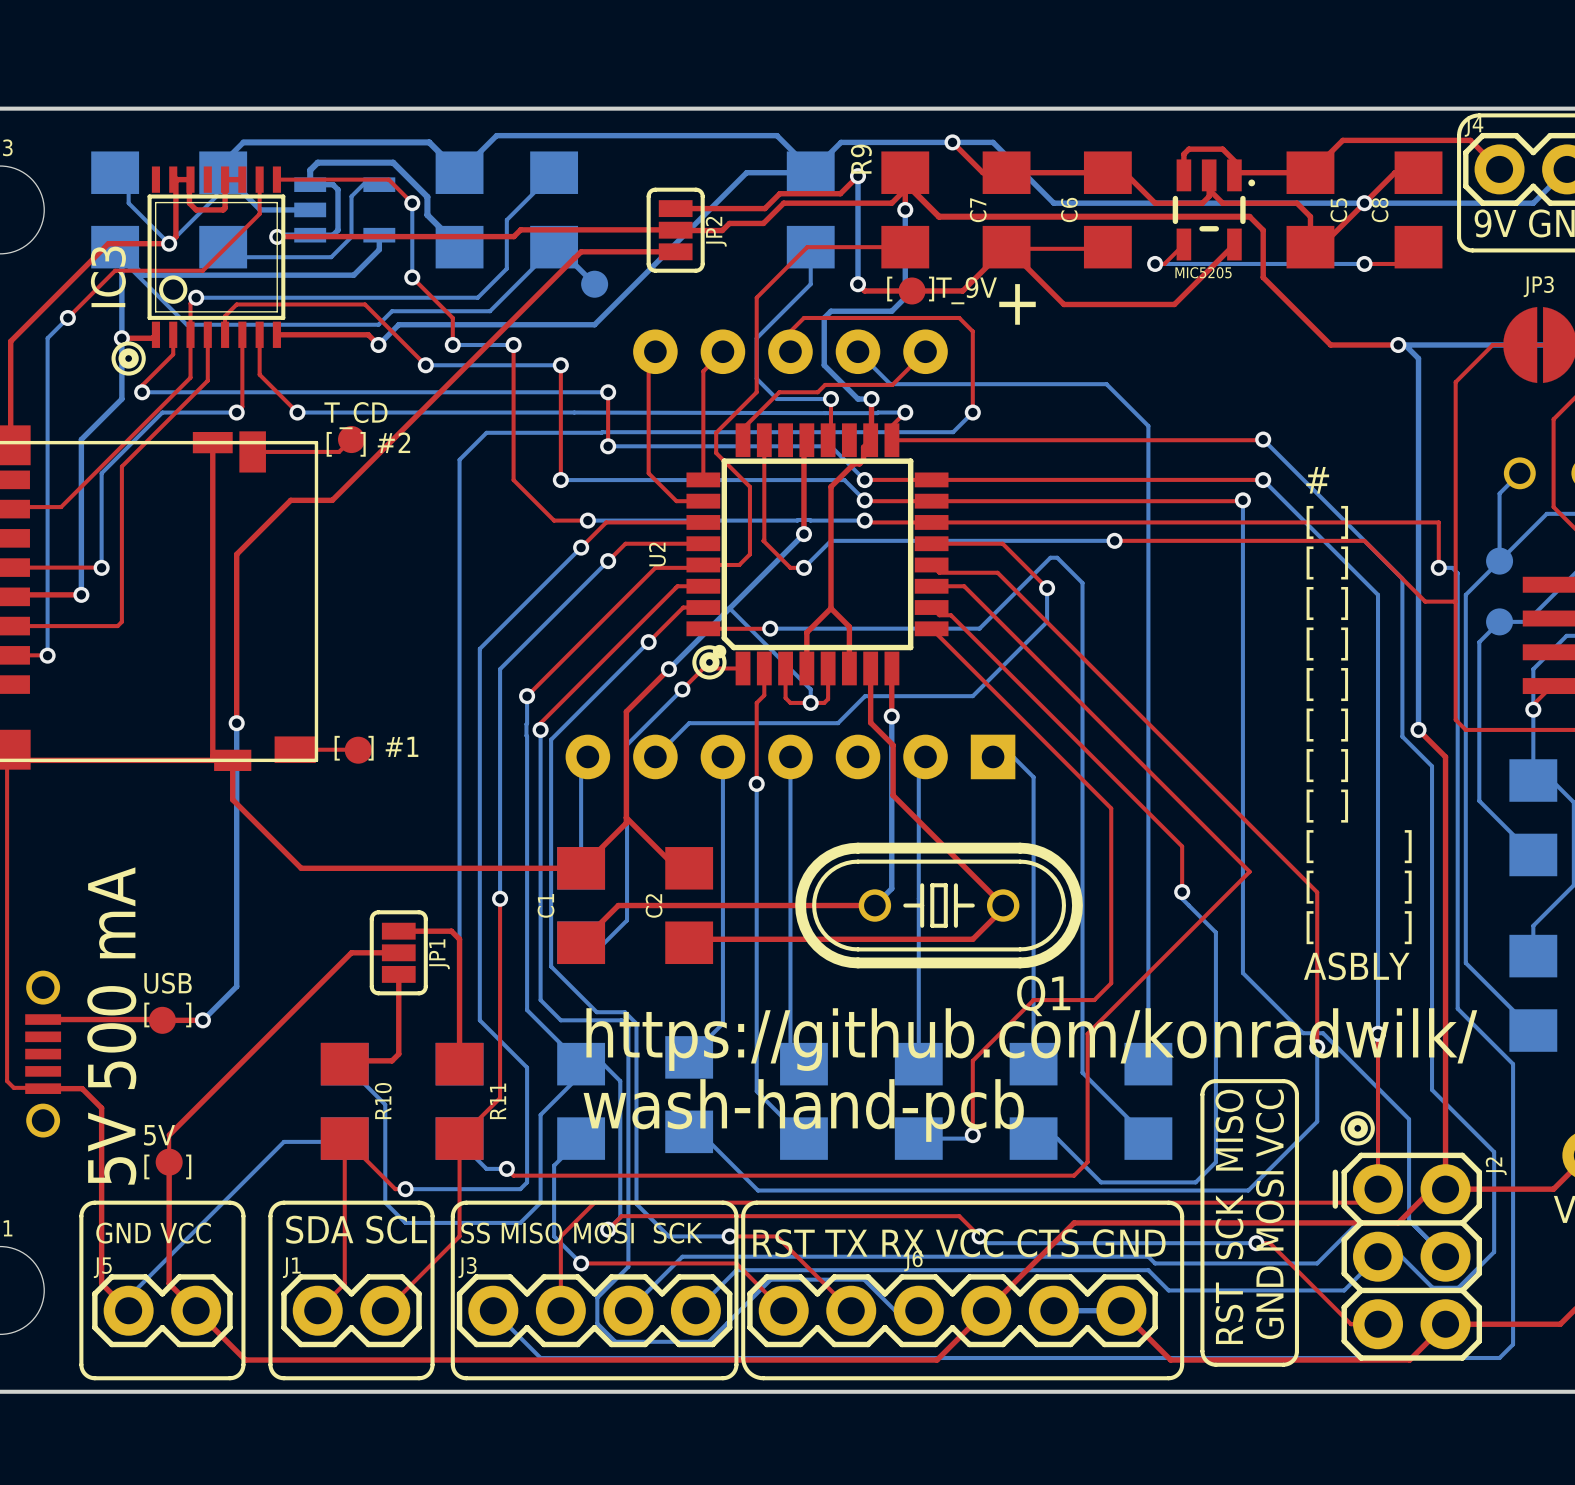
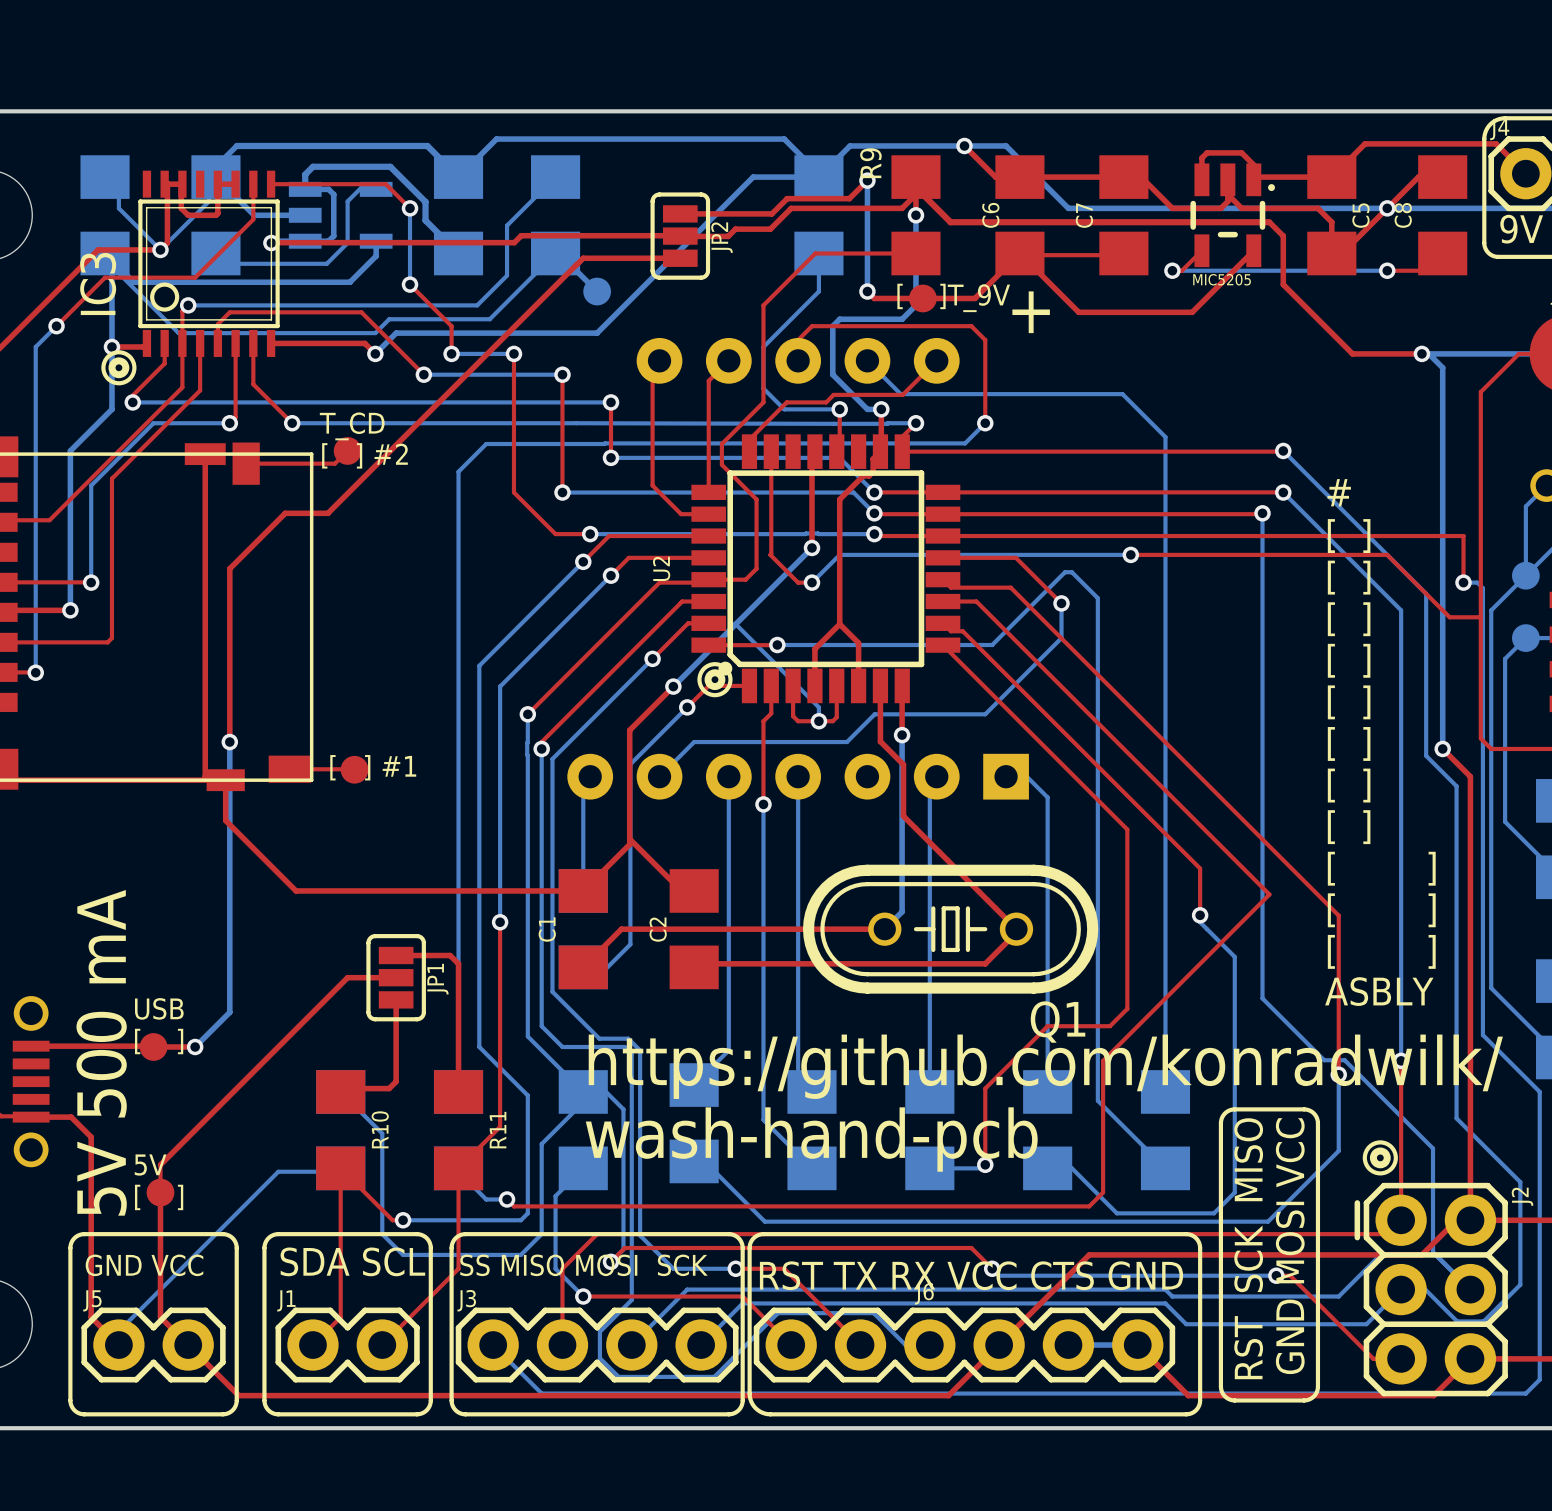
C7 name: C7 (978, 210) -> C6 (990, 215)
C6 name: C6 (1069, 210) -> C7 (1084, 215)

